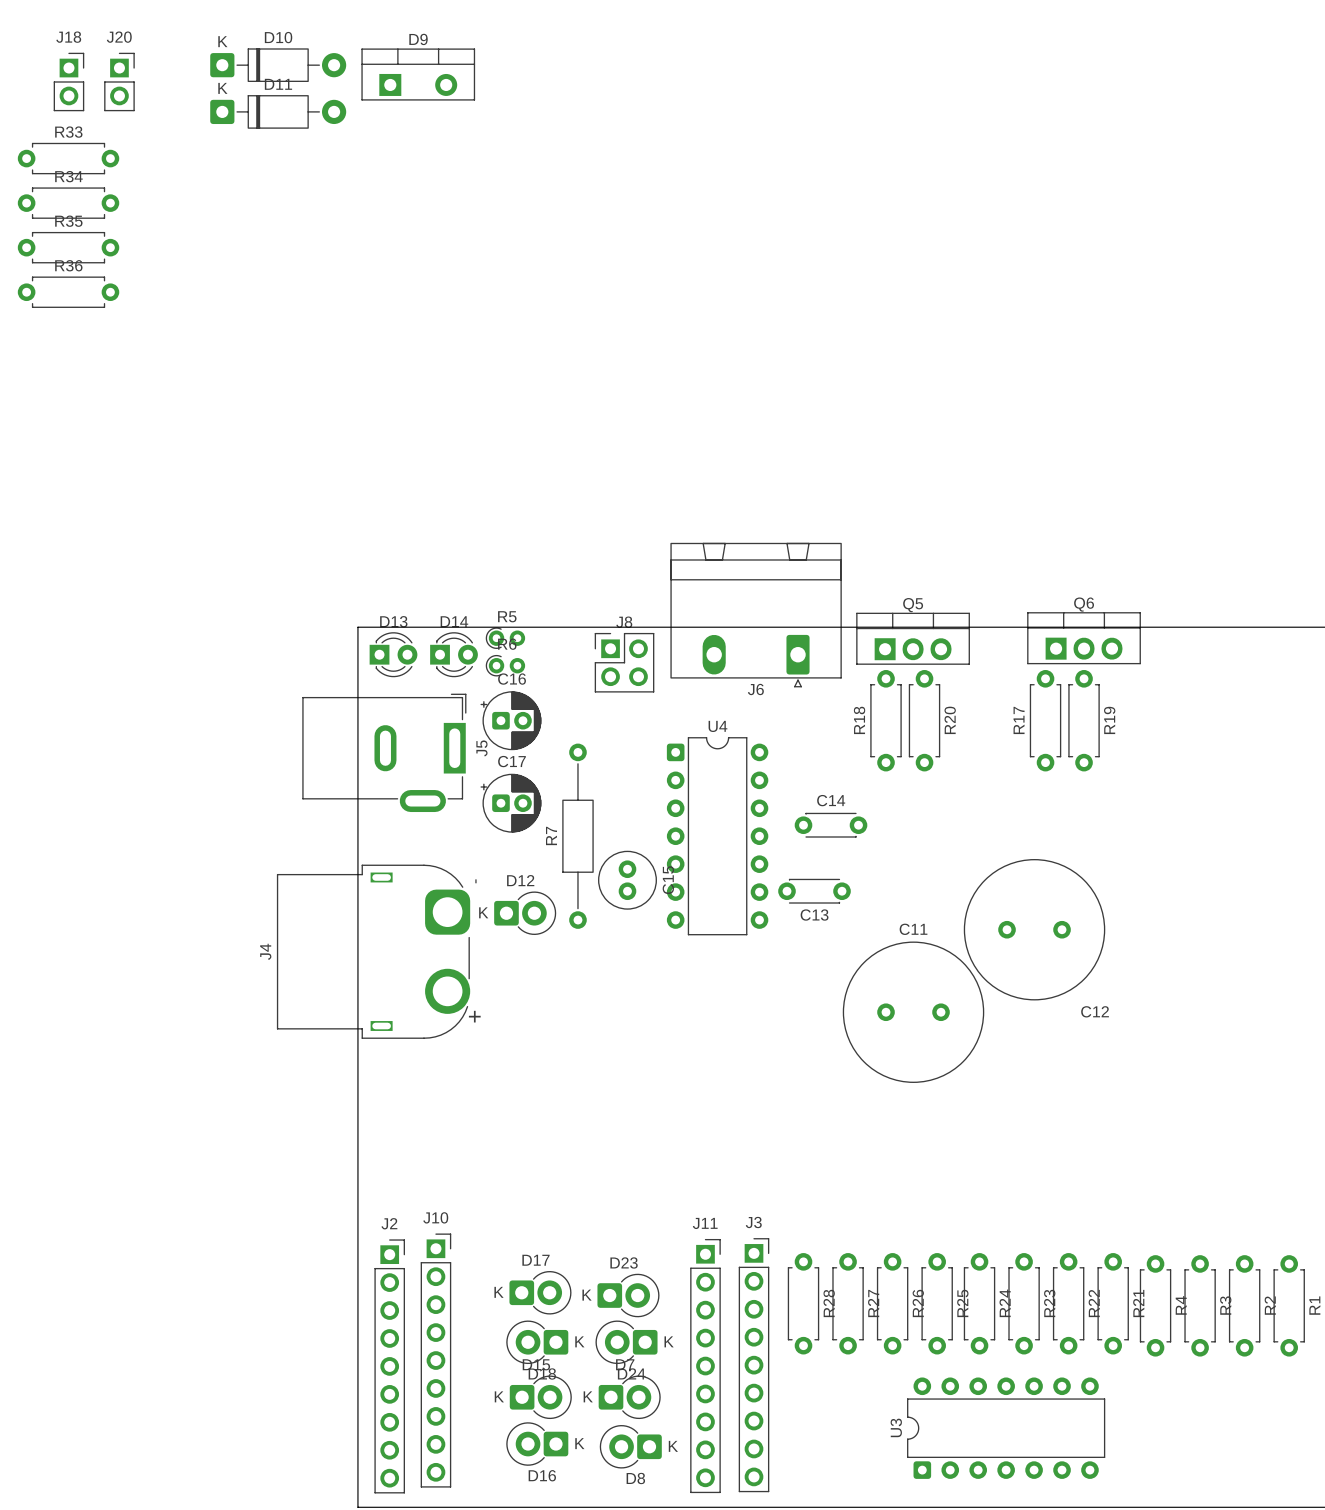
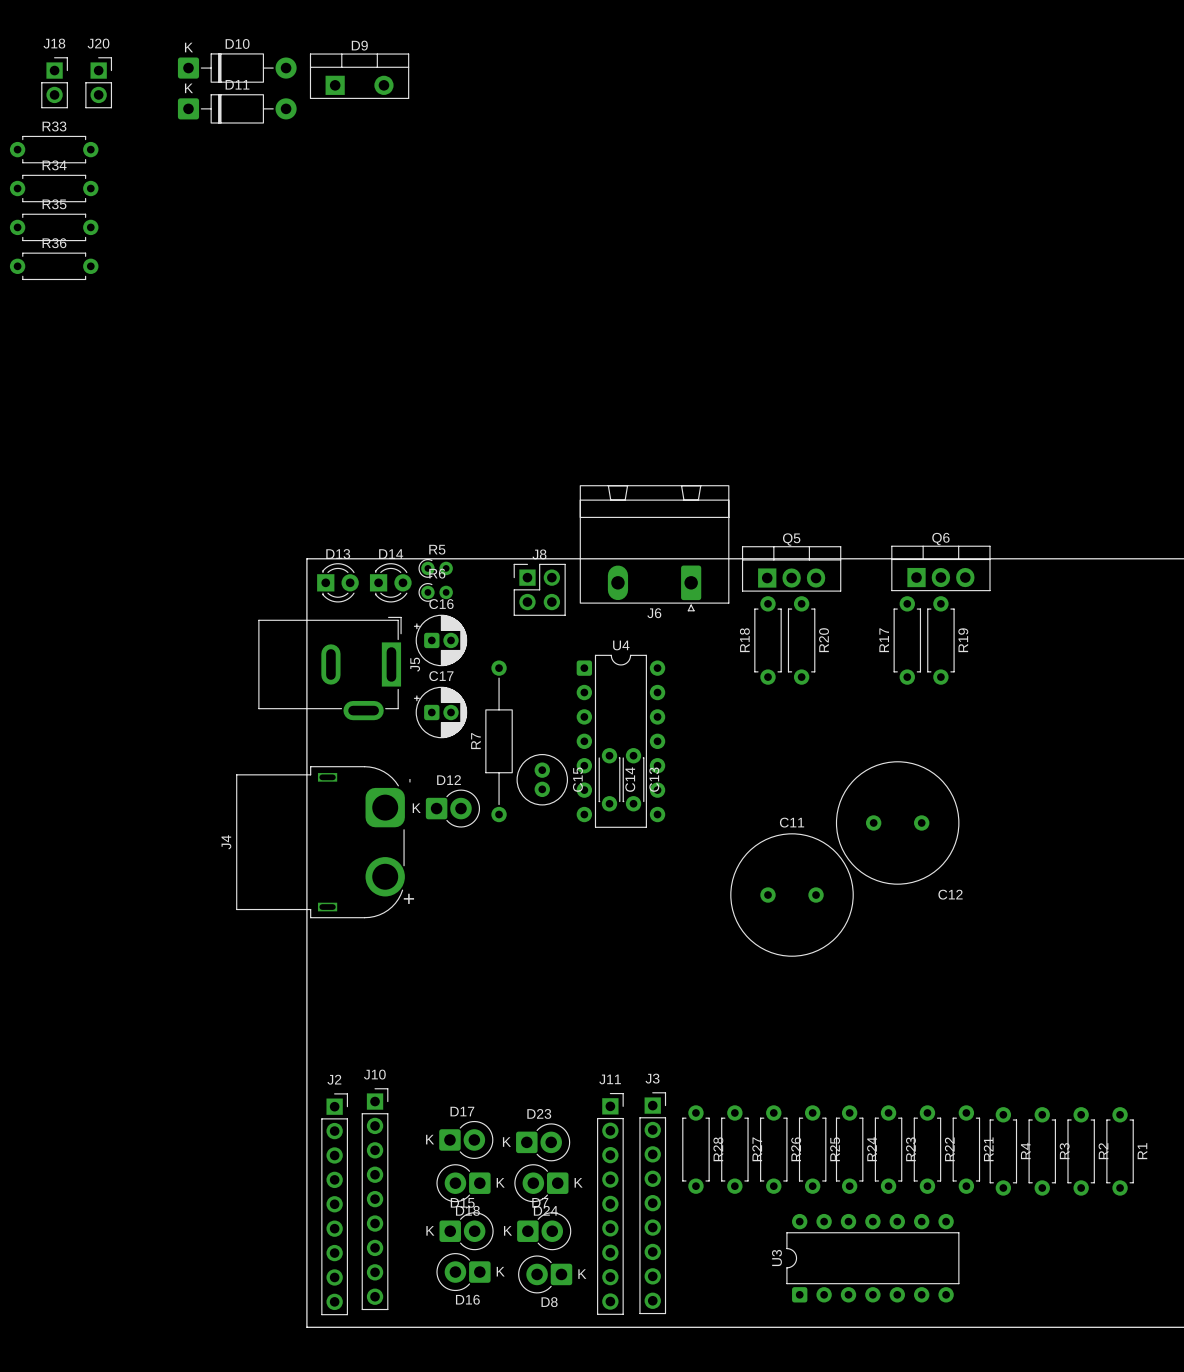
C14 rotation: 0° (831, 825) -> 90° clockwise (609, 779)
C14 position: (831, 825) -> (609, 779)
C13 rotation: 0° (814, 891) -> 90° clockwise (633, 779)
C13 position: (814, 891) -> (633, 779)
C13 name position: C13 (814, 915) -> C13 (654, 779)

